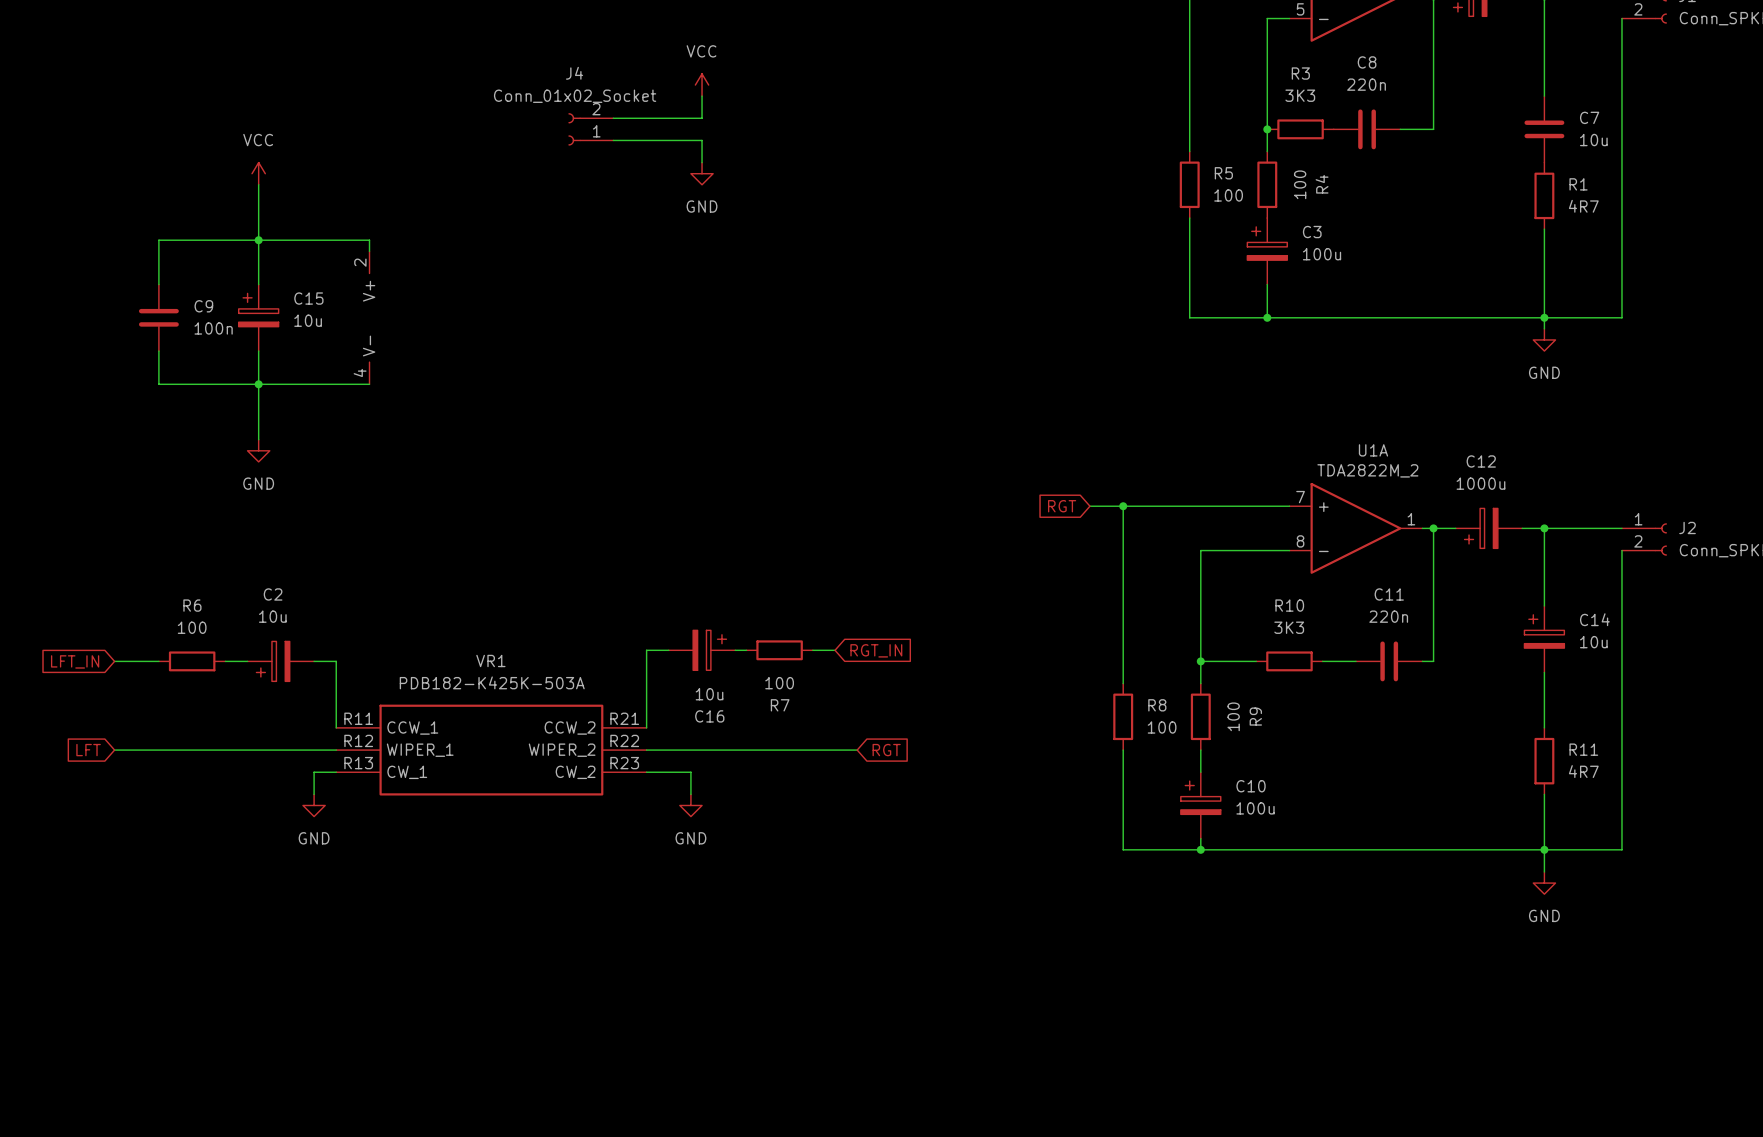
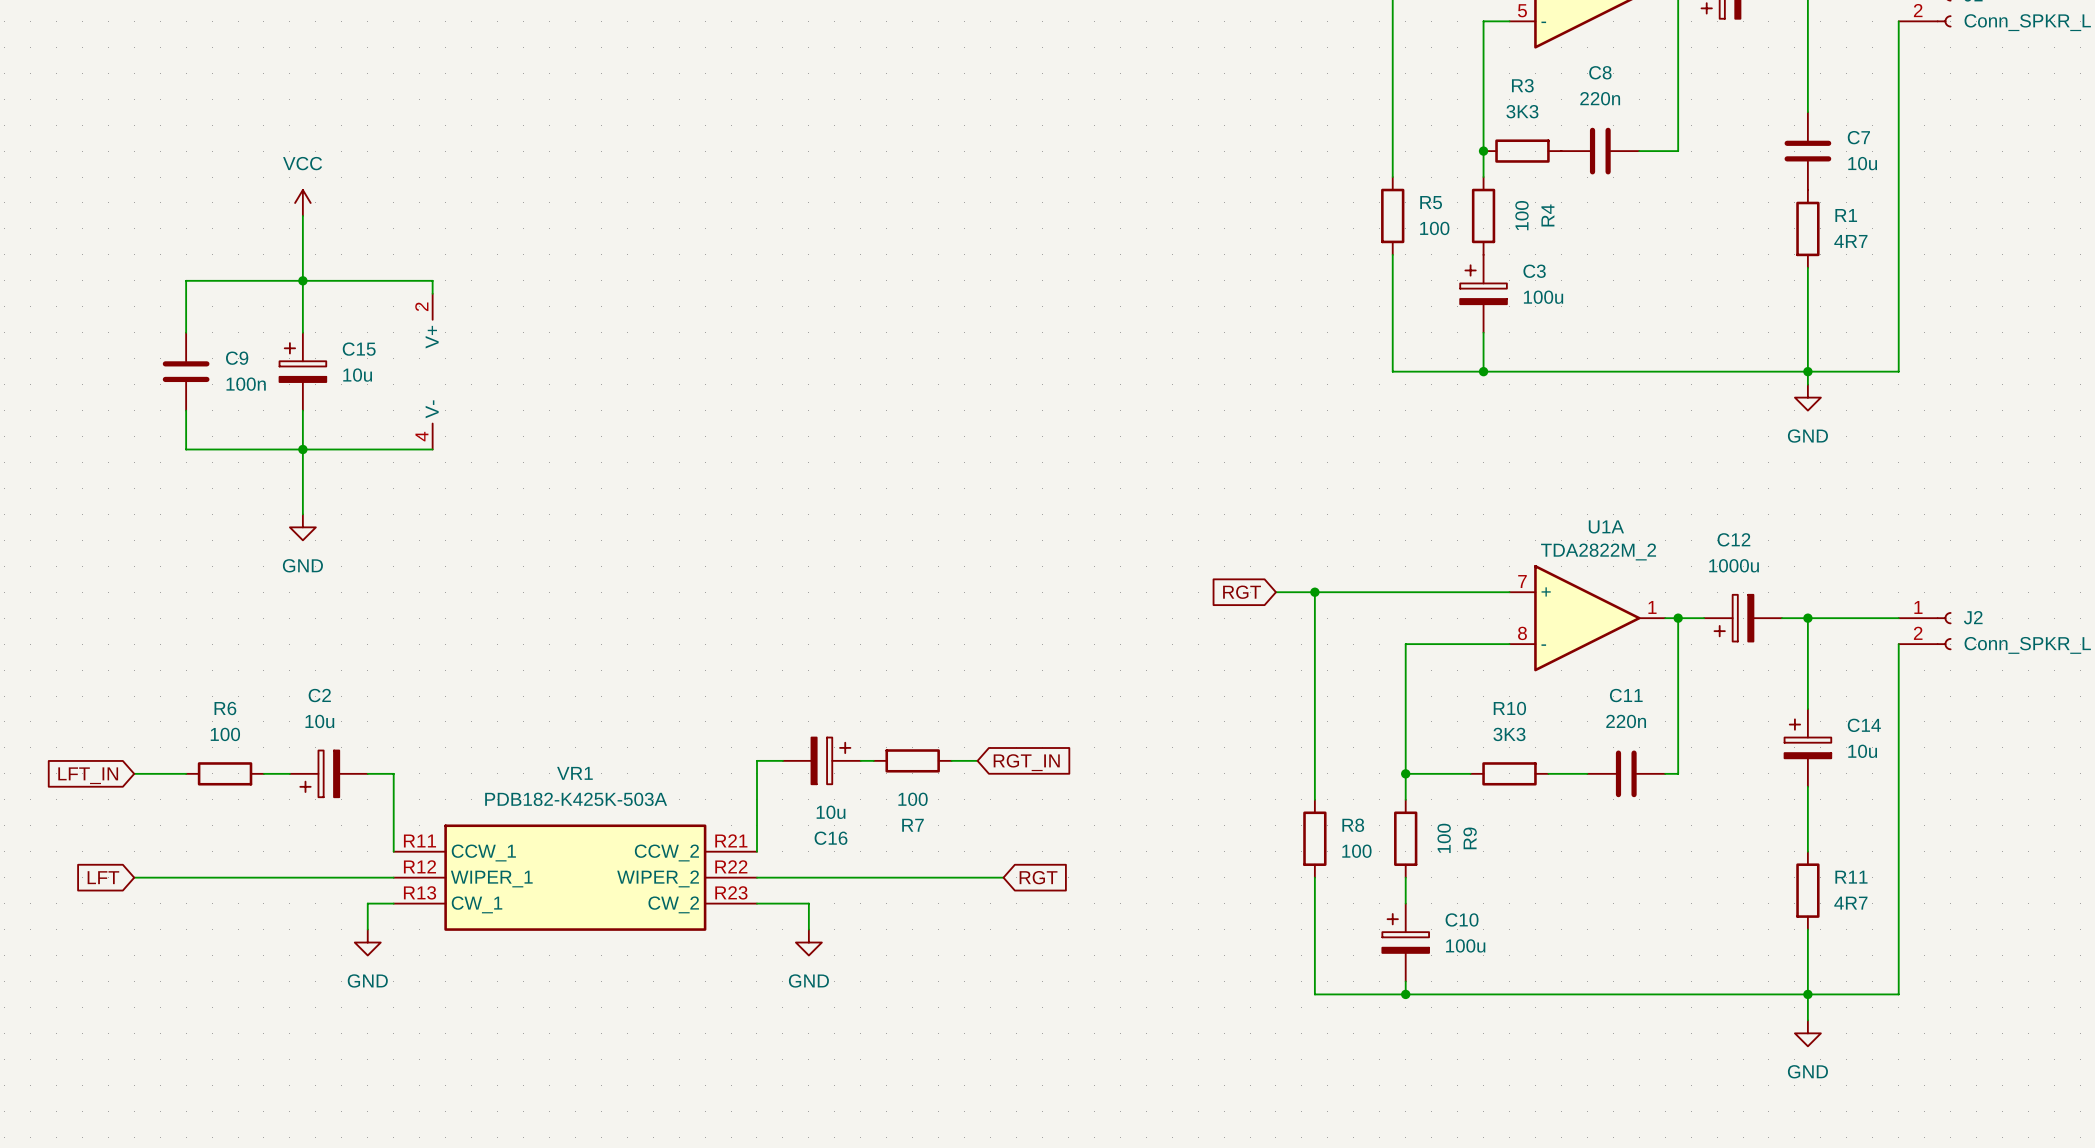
power symbol: VCC (702, 85) -> none
wire: (702, 96) (702, 118) (613, 118) -> none
J4: Conn_01x02_Socket (590, 129) -> none
wire: (613, 140) (702, 140) (702, 162) -> none
power symbol: GND (702, 173) -> none

